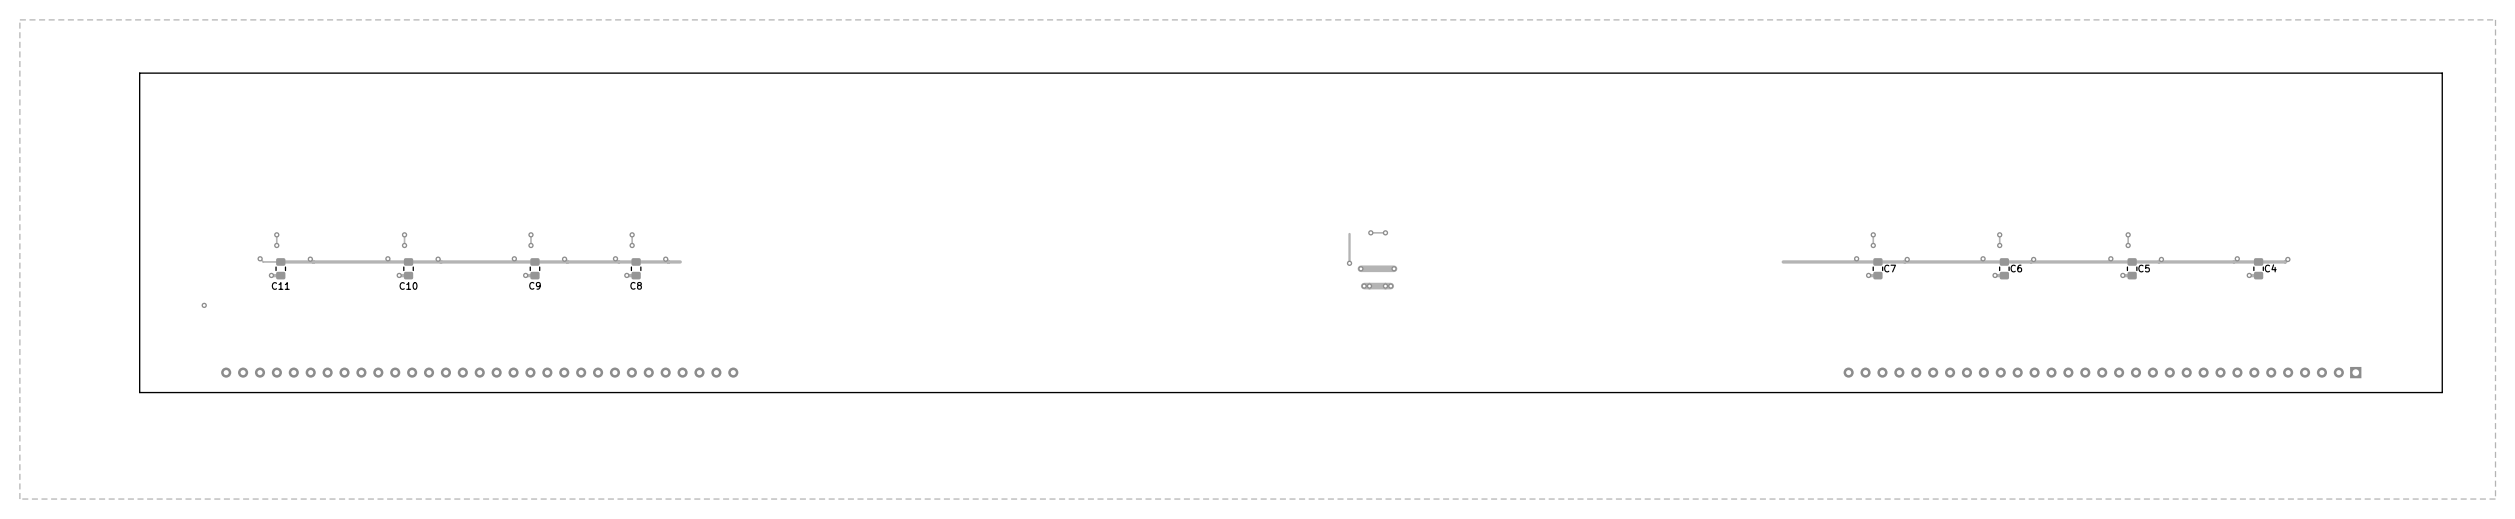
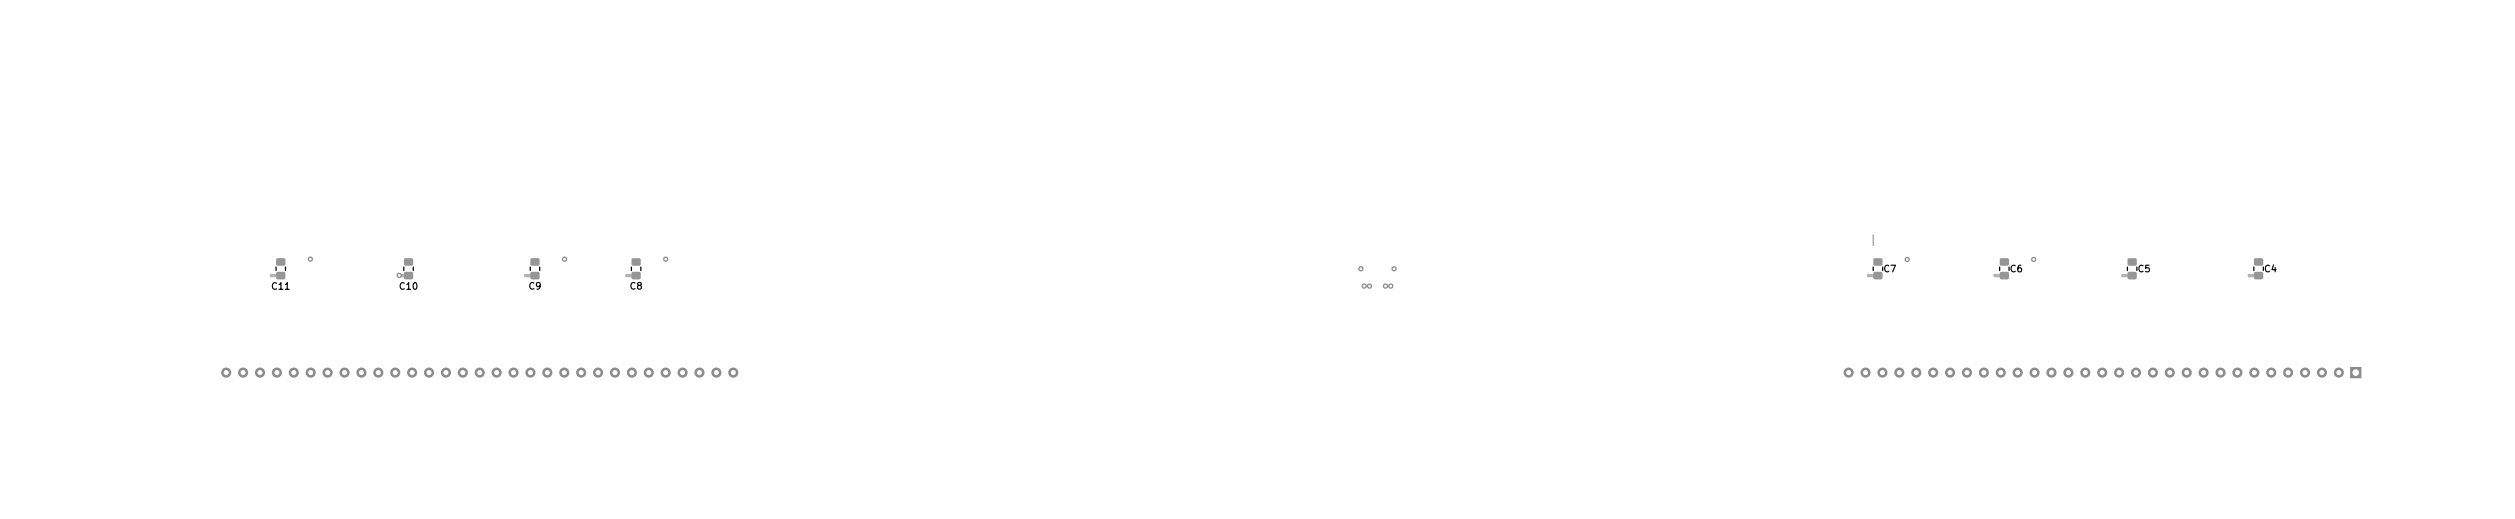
zone outline: (2495, 19) (2495, 499) (19, 499) (19, 19) (2495, 19) -> none
board edge: (2442, 73) (139, 73) (139, 392) (2442, 392) (2442, 73) -> none
via: (1370, 232) -> none
track: (1385, 232) (1370, 232) -> none
via: (1385, 232) -> none
track: (276, 234) (276, 245) -> none
via: (276, 234) -> none
track: (404, 234) (404, 245) -> none
via: (404, 234) -> none
track: (530, 234) (530, 245) -> none
via: (530, 234) -> none
track: (632, 234) (632, 245) -> none
via: (632, 234) -> none
track: (1349, 234) (1349, 263) -> none
via: (1873, 234) -> none
track: (1999, 234) (1999, 245) -> none
via: (1999, 234) -> none
track: (2128, 234) (2128, 245) -> none
via: (2128, 234) -> none
via: (276, 245) -> none
via: (404, 245) -> none
via: (530, 245) -> none
via: (632, 245) -> none
via: (1873, 245) -> none
via: (1999, 245) -> none
via: (2128, 245) -> none
track: (260, 258) (263, 261) (680, 261) -> none
via: (260, 258) -> none
via: (387, 258) -> none
via: (514, 258) -> none
via: (615, 258) -> none
via: (1856, 258) -> none
via: (1983, 258) -> none
via: (2110, 258) -> none
via: (2237, 258) -> none
via: (438, 259) -> none
via: (2161, 259) -> none
track: (2287, 259) (2285, 261) (1783, 261) -> none
via: (2287, 259) -> none
via: (1349, 263) -> none
track: (1394, 268) (1360, 268) -> none
via: (271, 275) -> none
via: (525, 275) -> none
via: (626, 275) -> none
via: (1868, 275) -> none
via: (1995, 275) -> none
via: (2122, 275) -> none
via: (2249, 275) -> none
track: (1390, 286) (1364, 286) -> none
via: (204, 305) -> none

